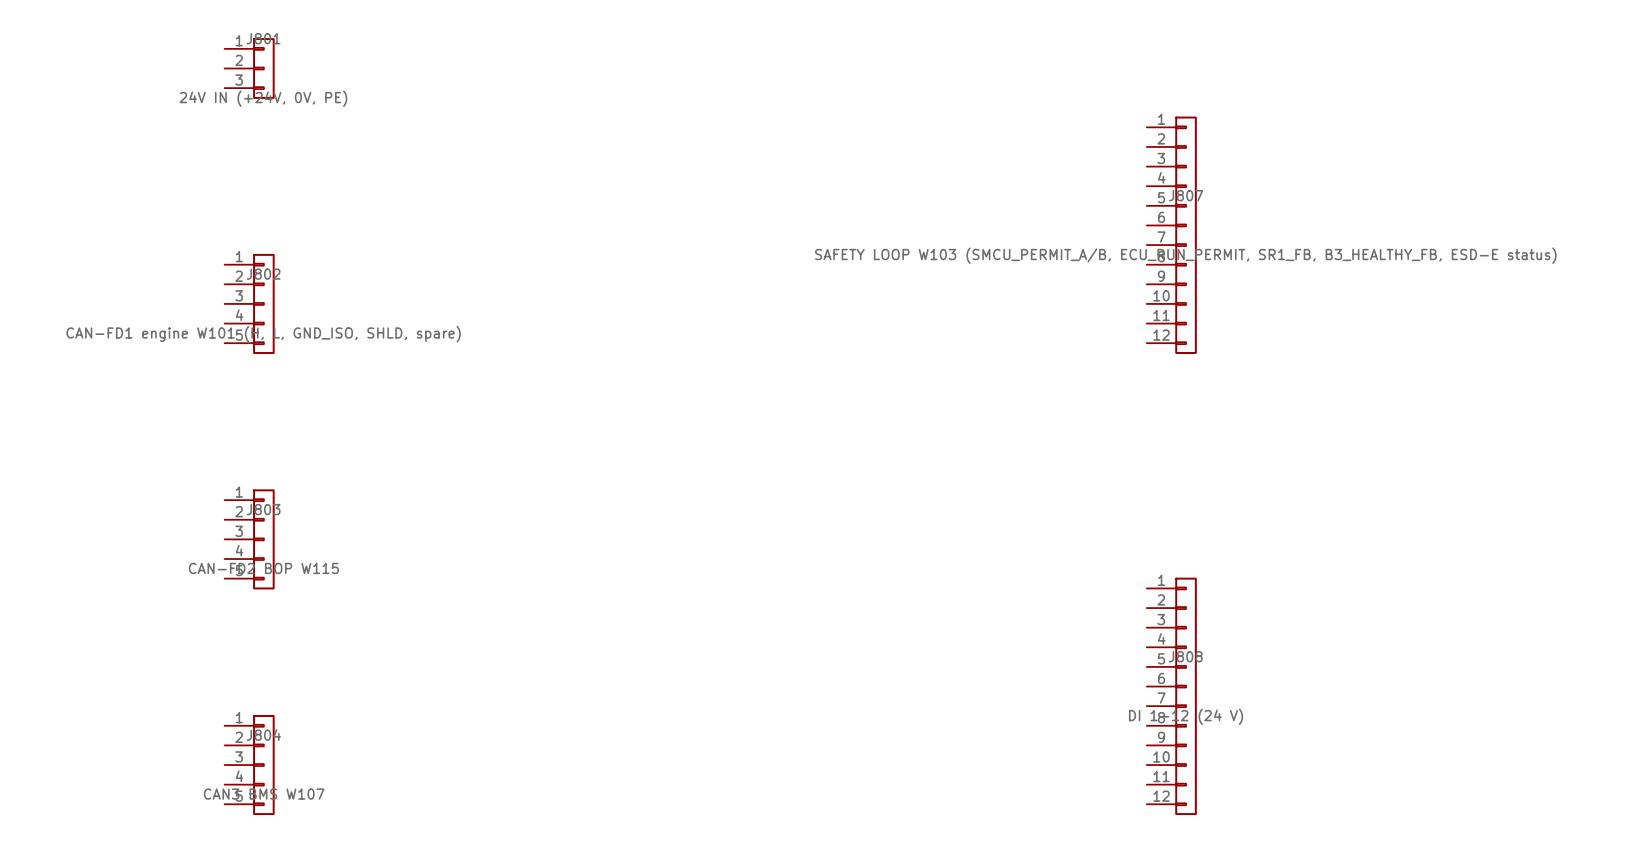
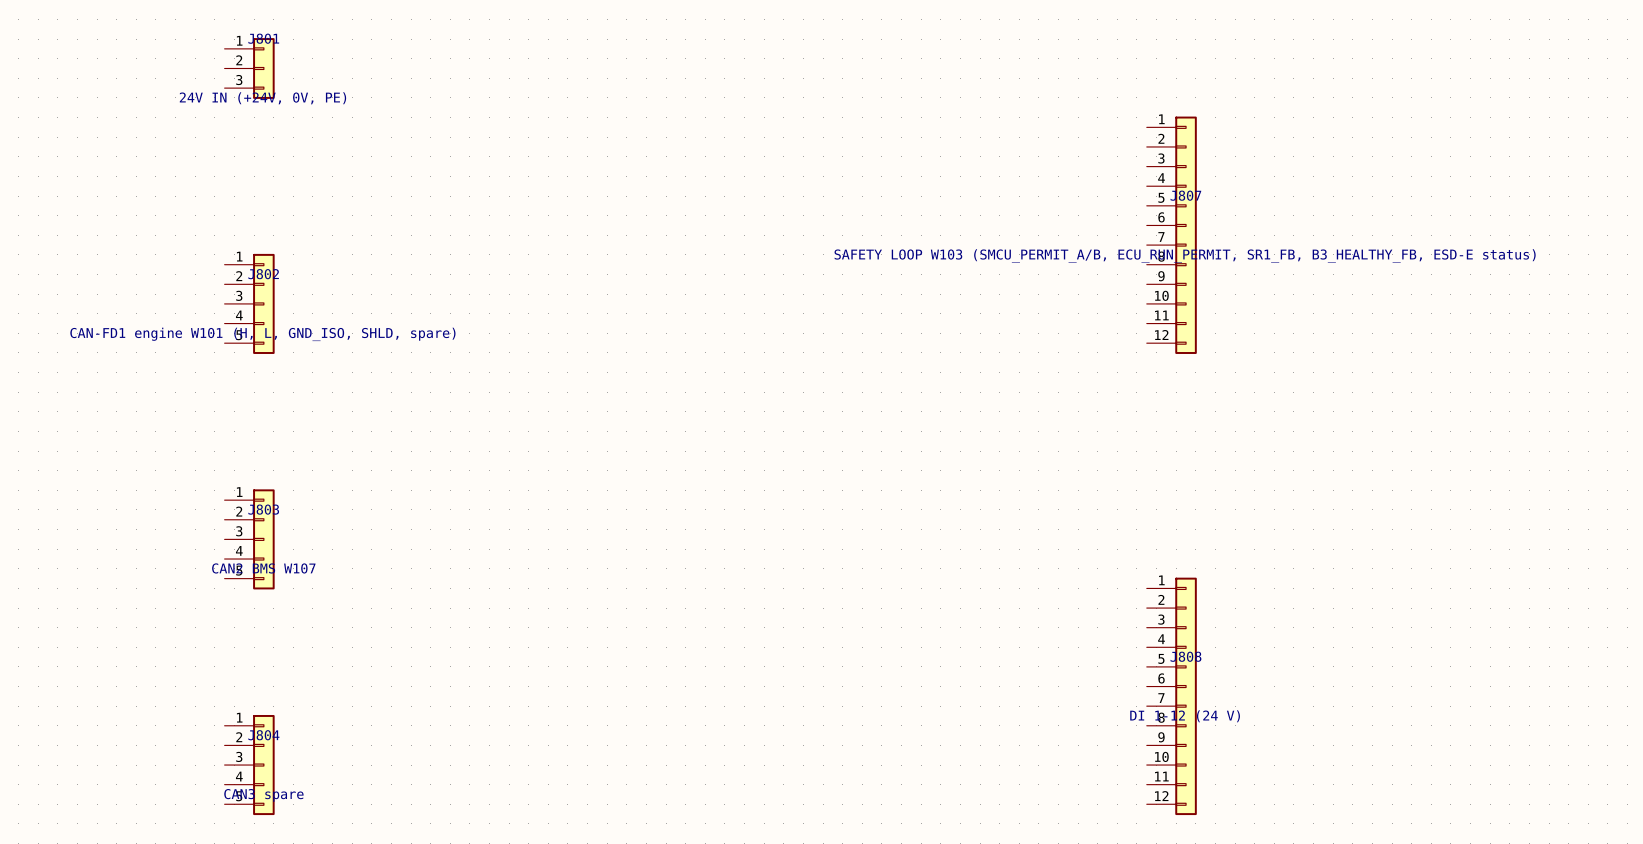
J803 value: CAN-FD2 BOP W115 (263, 568) -> CAN2 BMS W107 (263, 568)
J804 value: CAN3 BMS W107 (264, 794) -> CAN3 spare (263, 795)

